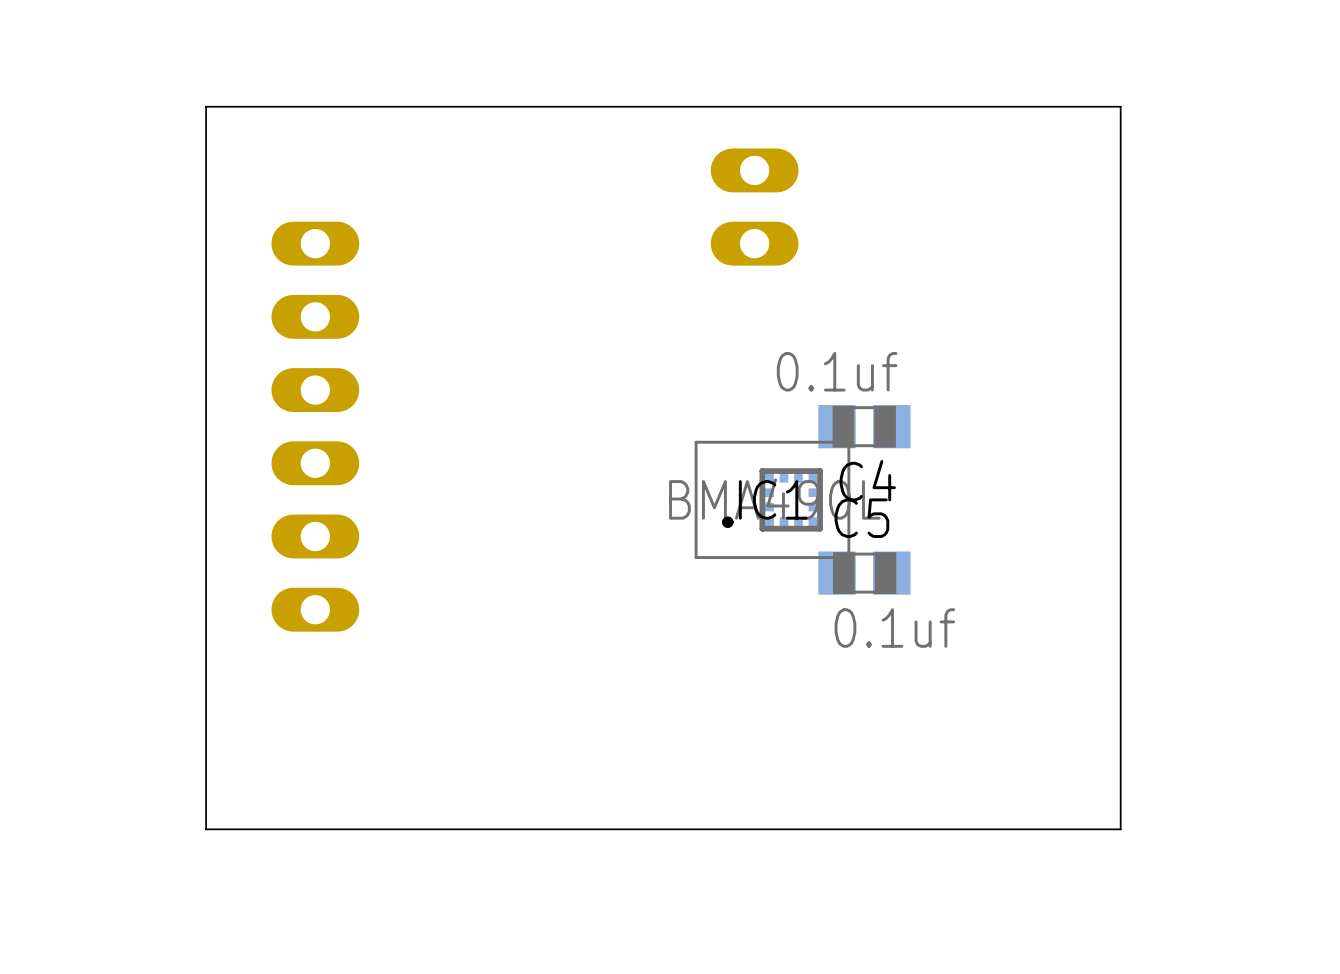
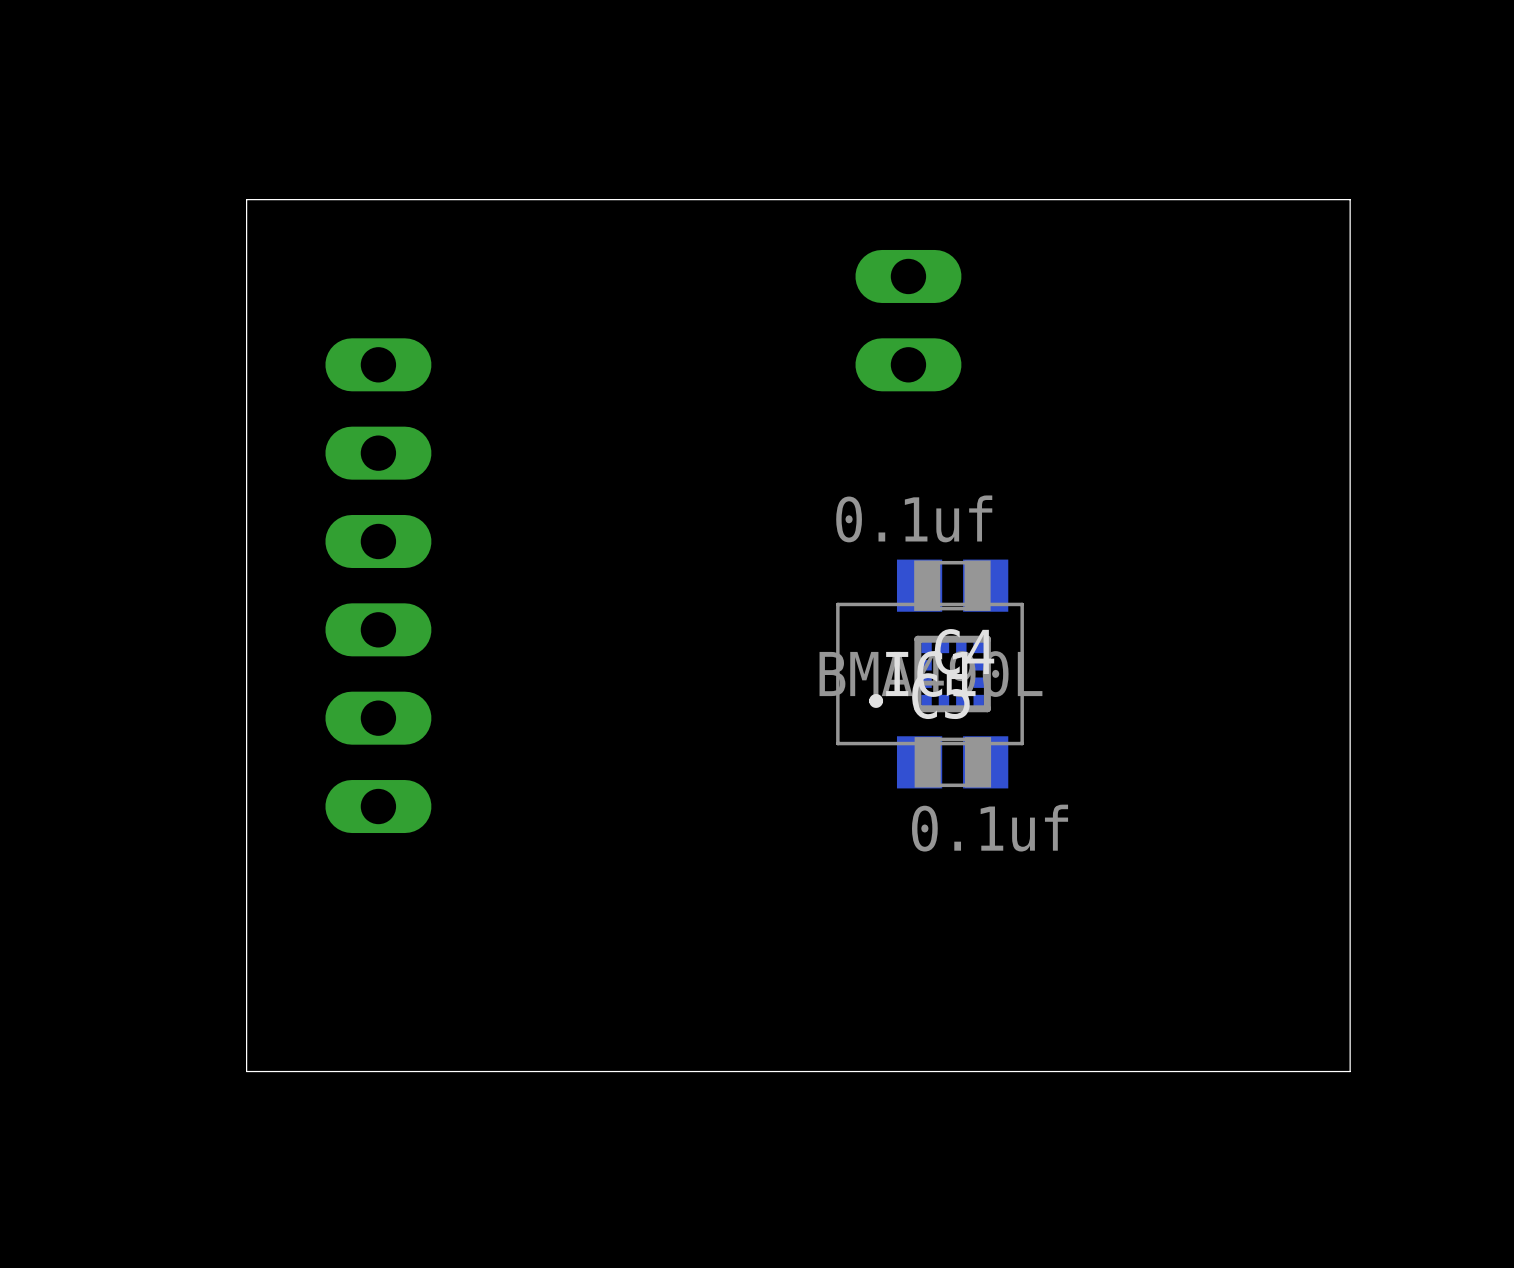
C4 position: (864, 426) -> (952, 585)
C5 position: (864, 573) -> (952, 762)

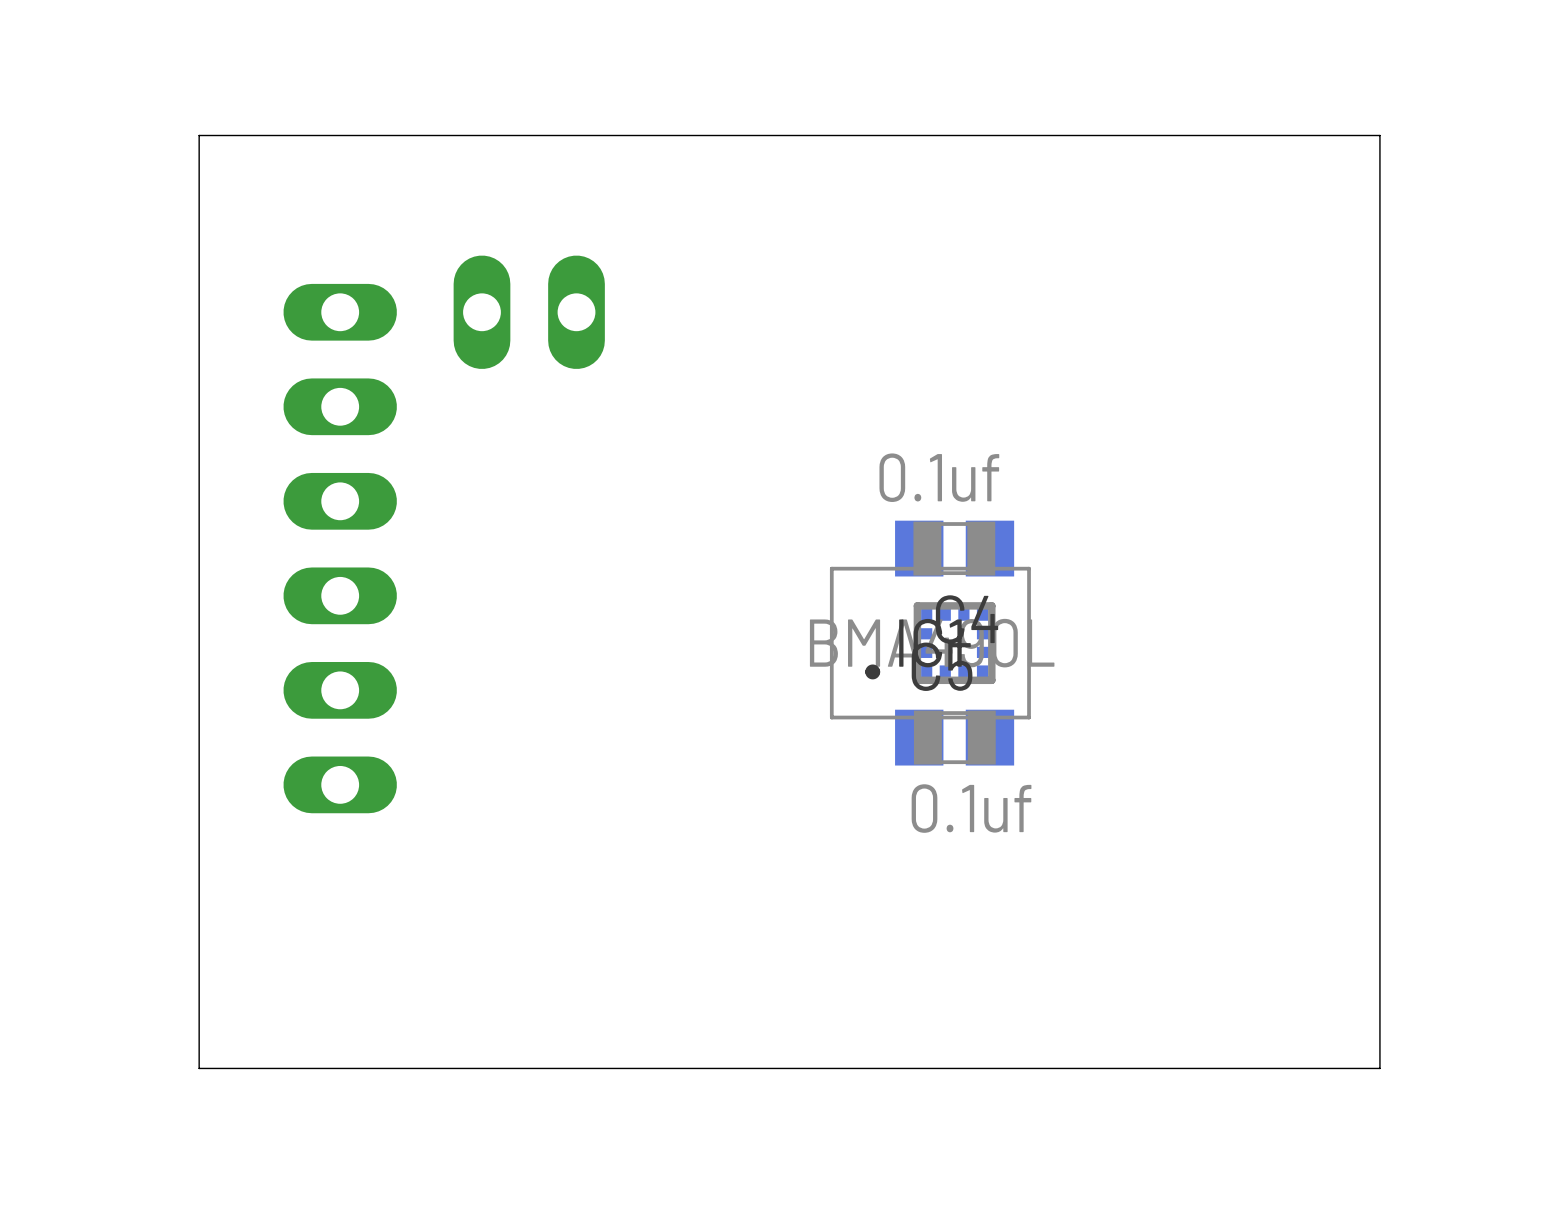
part rotation: 0° (908, 320) -> 90° clockwise (529, 312)
part position: (908, 320) -> (529, 312)

